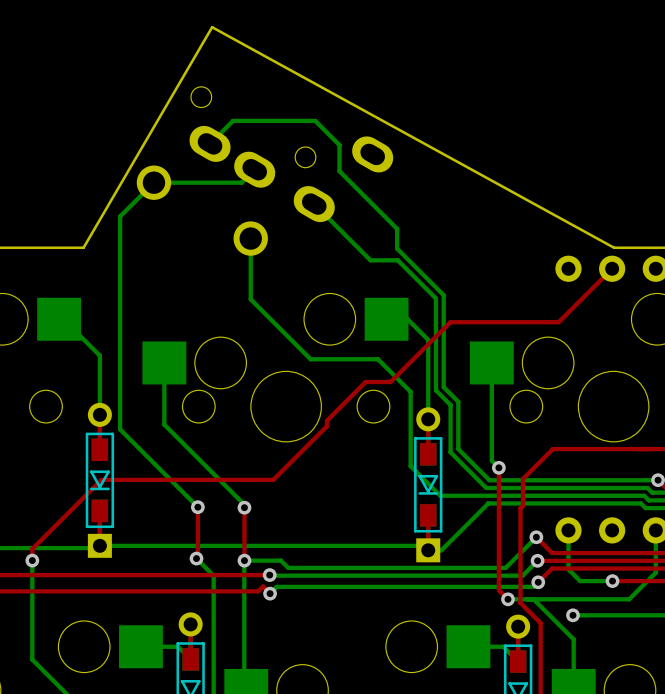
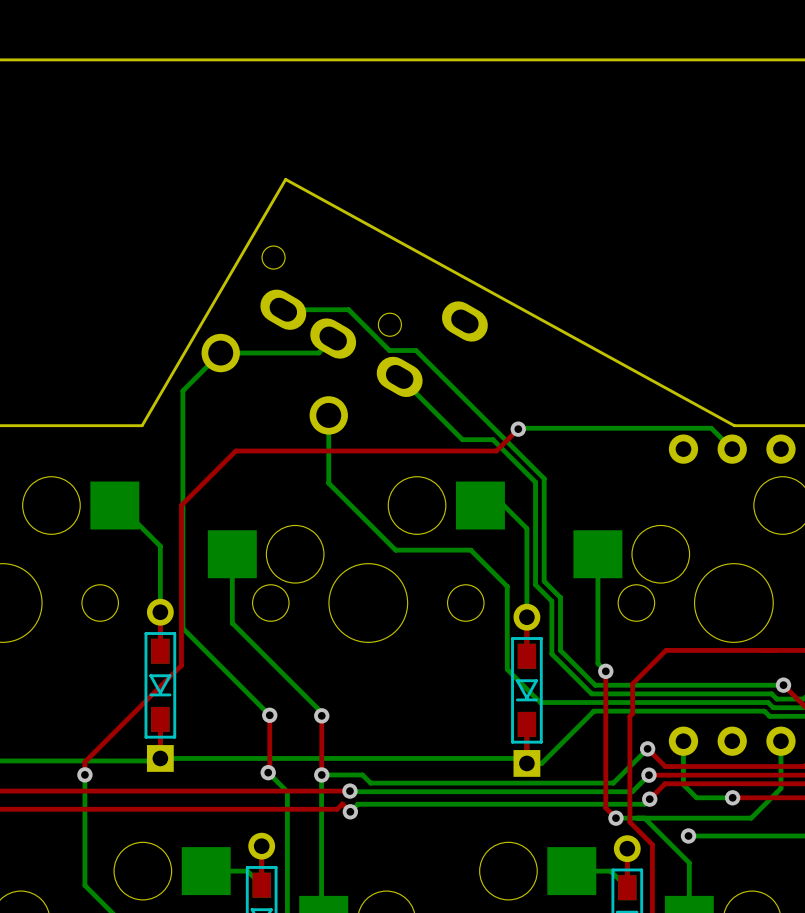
bottom track: (210, 143) (233, 120) (315, 120) (339, 145) (339, 171) (397, 228) (397, 248) -> (283, 309) (348, 309) (389, 350) (416, 350) (492, 426)
bottom track: none -> (518, 429) (711, 428) (732, 449)
via: none -> (518, 429)
top track: (612, 268) (558, 322) (450, 322) (390, 382) (365, 382) (326, 420) (326, 426) (273, 479) (101, 479) -> (518, 429) (496, 451) (235, 451) (181, 505) (181, 665) (162, 684)

